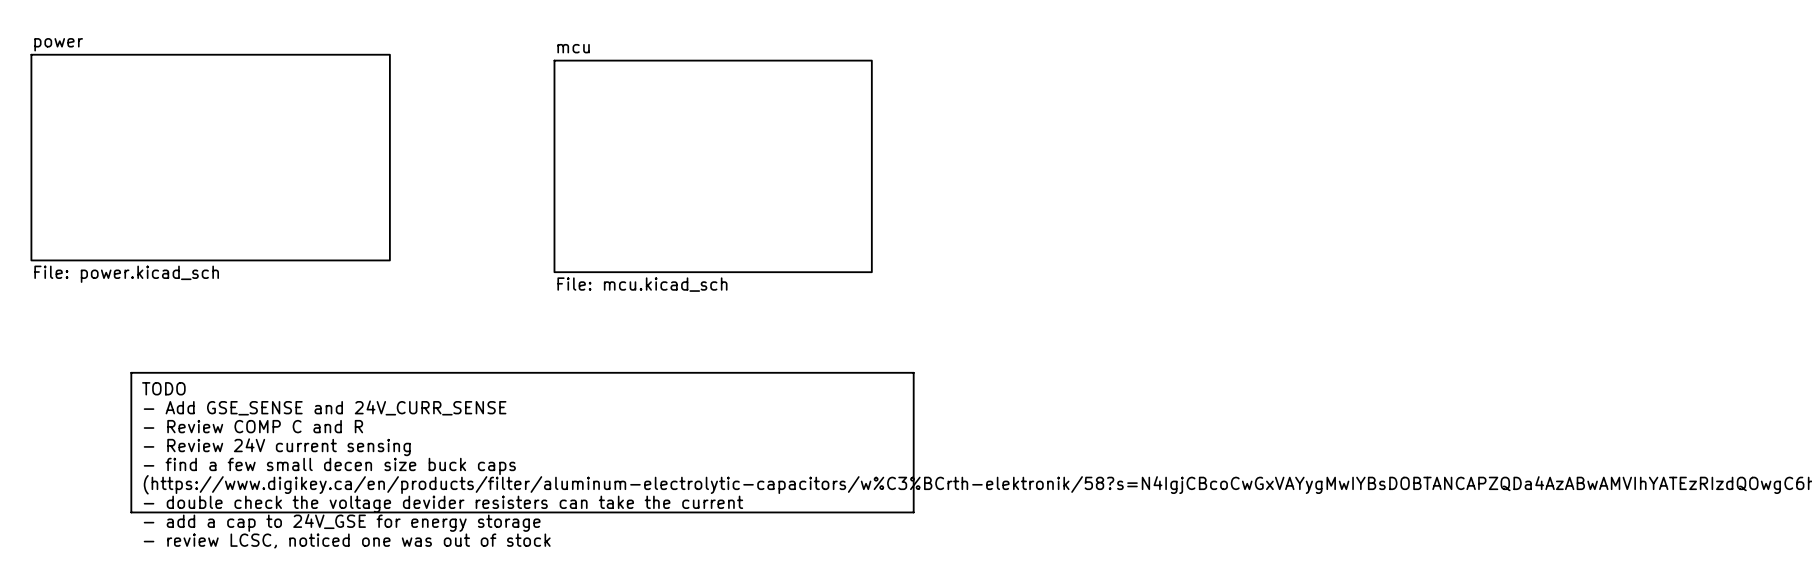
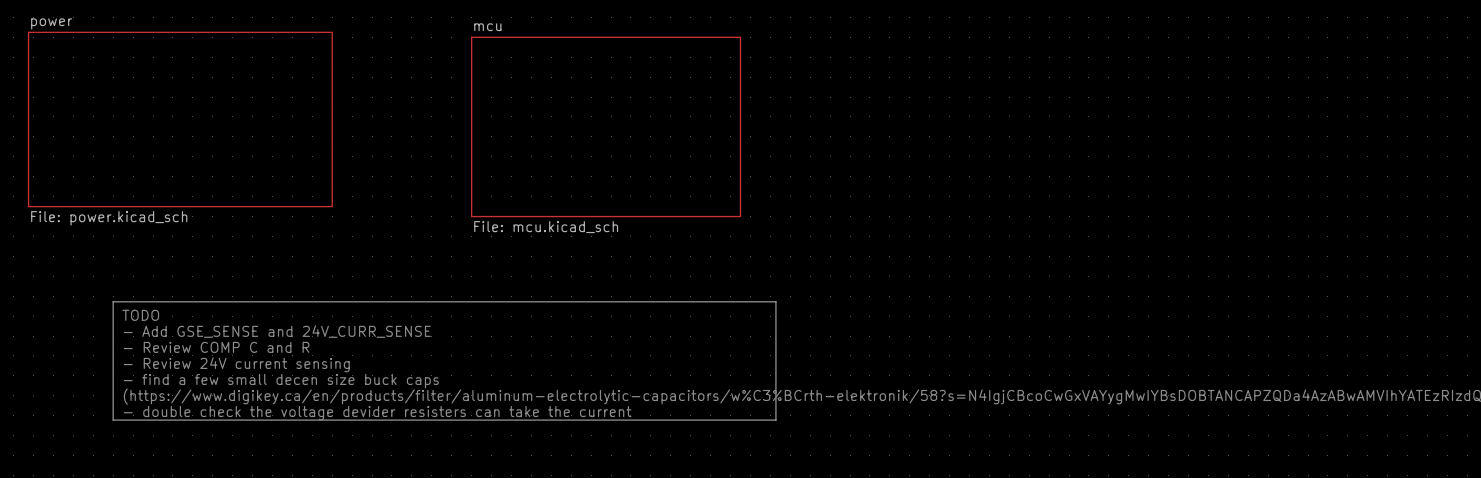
text: - add a cap to 24V_GSE for energy storage (342, 522) -> none
text: - review LCSC, noticed one was out of stock (347, 541) -> none

